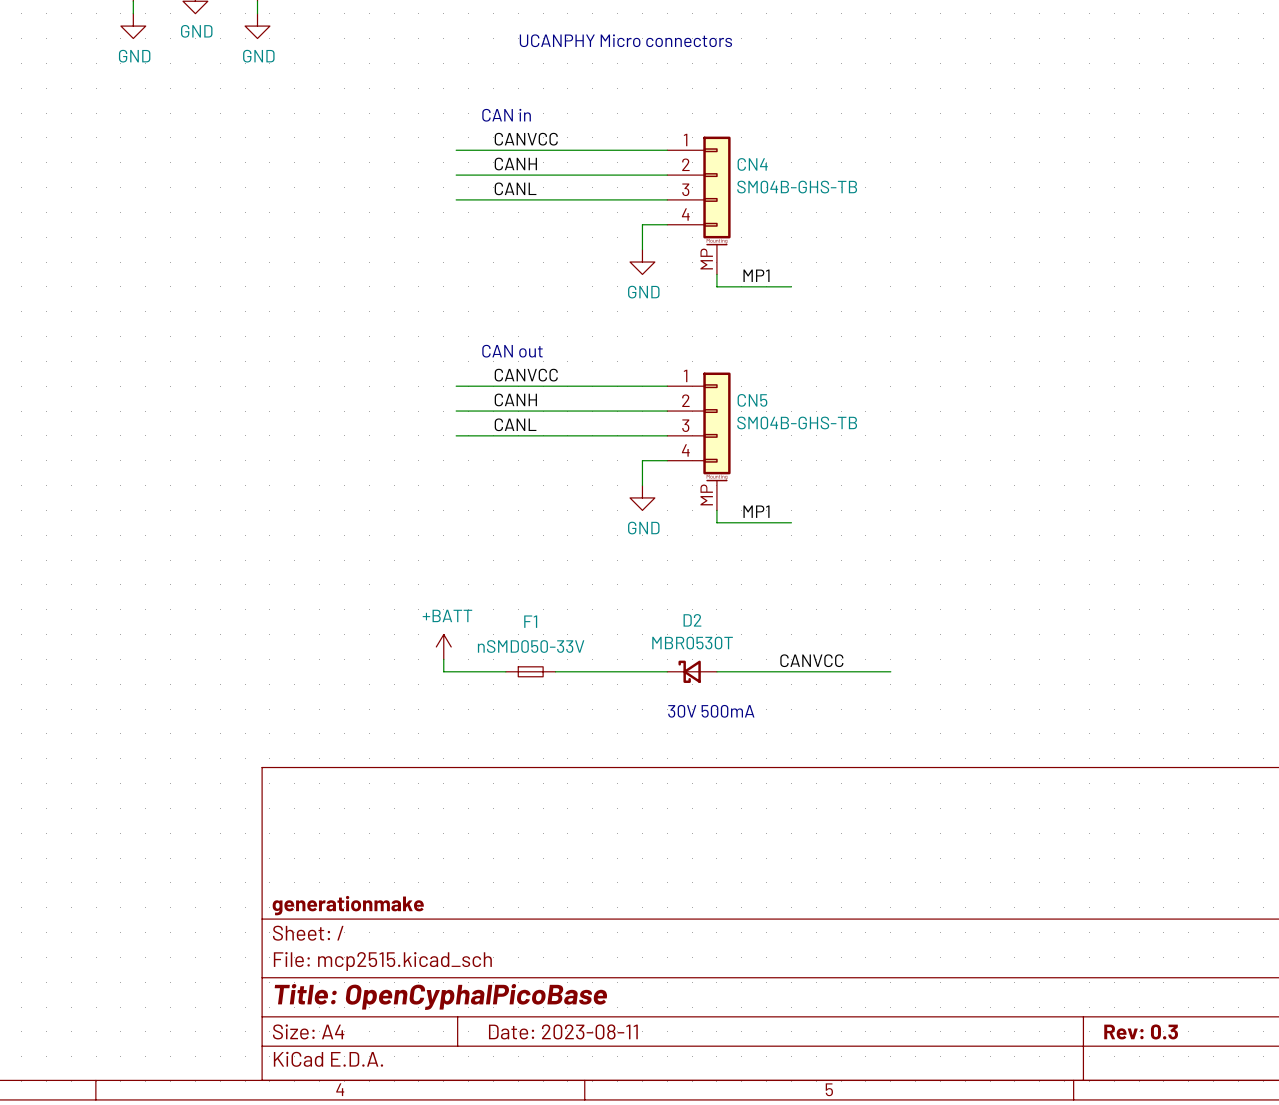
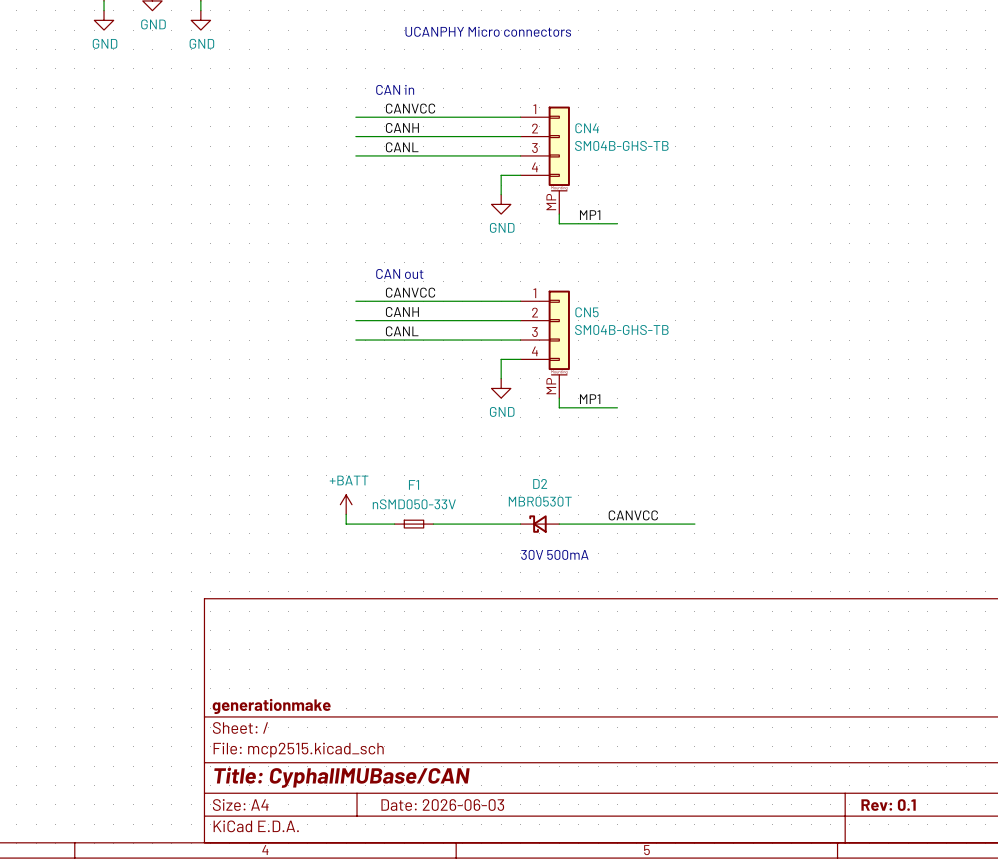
title block: Title: OpenCyphalPicoBase (440, 996) -> Title: CyphalIMUBase/CAN (341, 777)
title block: Date: 2023-08-11 (563, 1031) -> Date: 2026-06-03 (442, 805)
title block: Rev: 0.3 (1141, 1031) -> Rev: 0.1 (888, 805)

